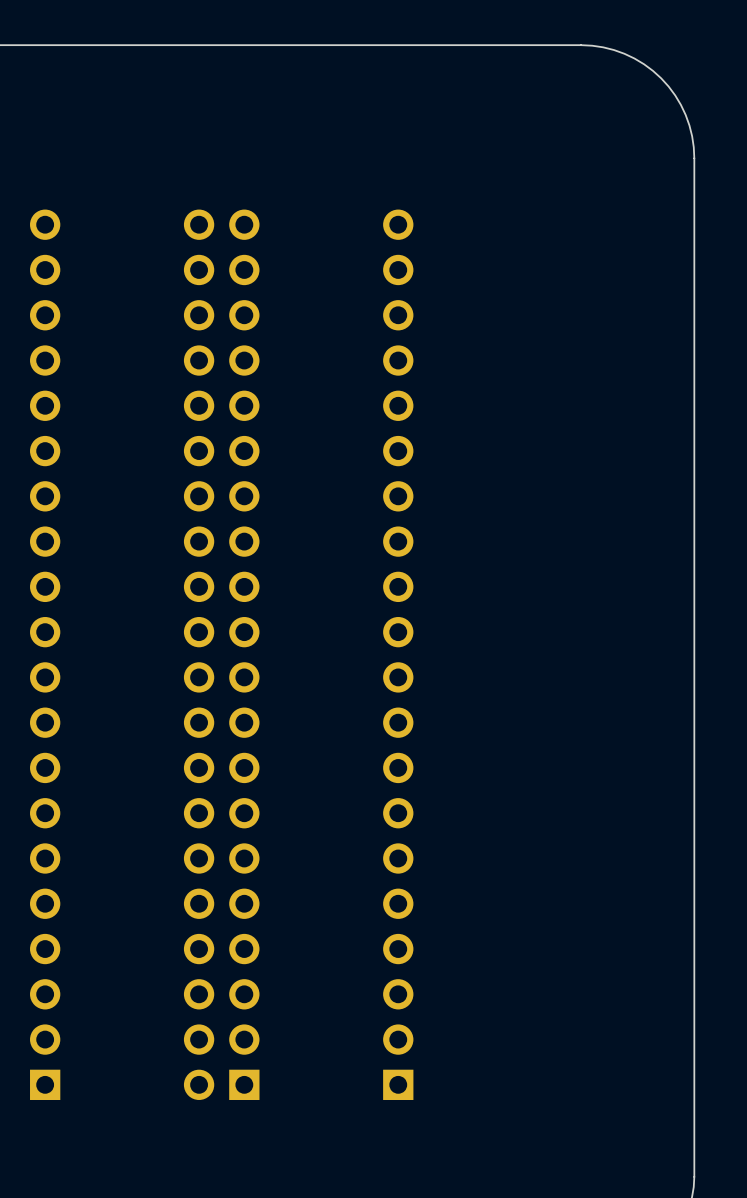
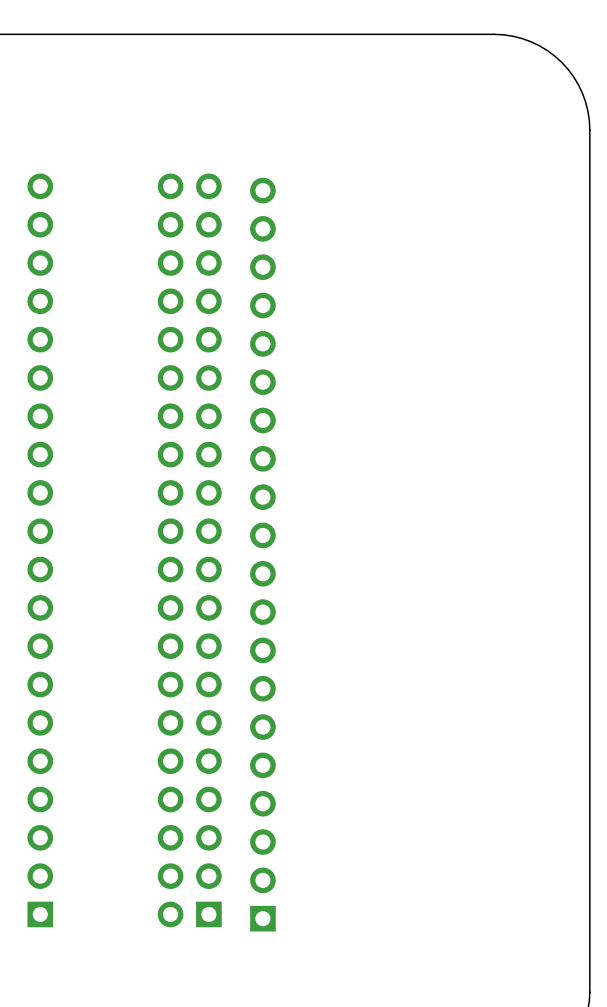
part position: (398, 654) -> (262, 554)

